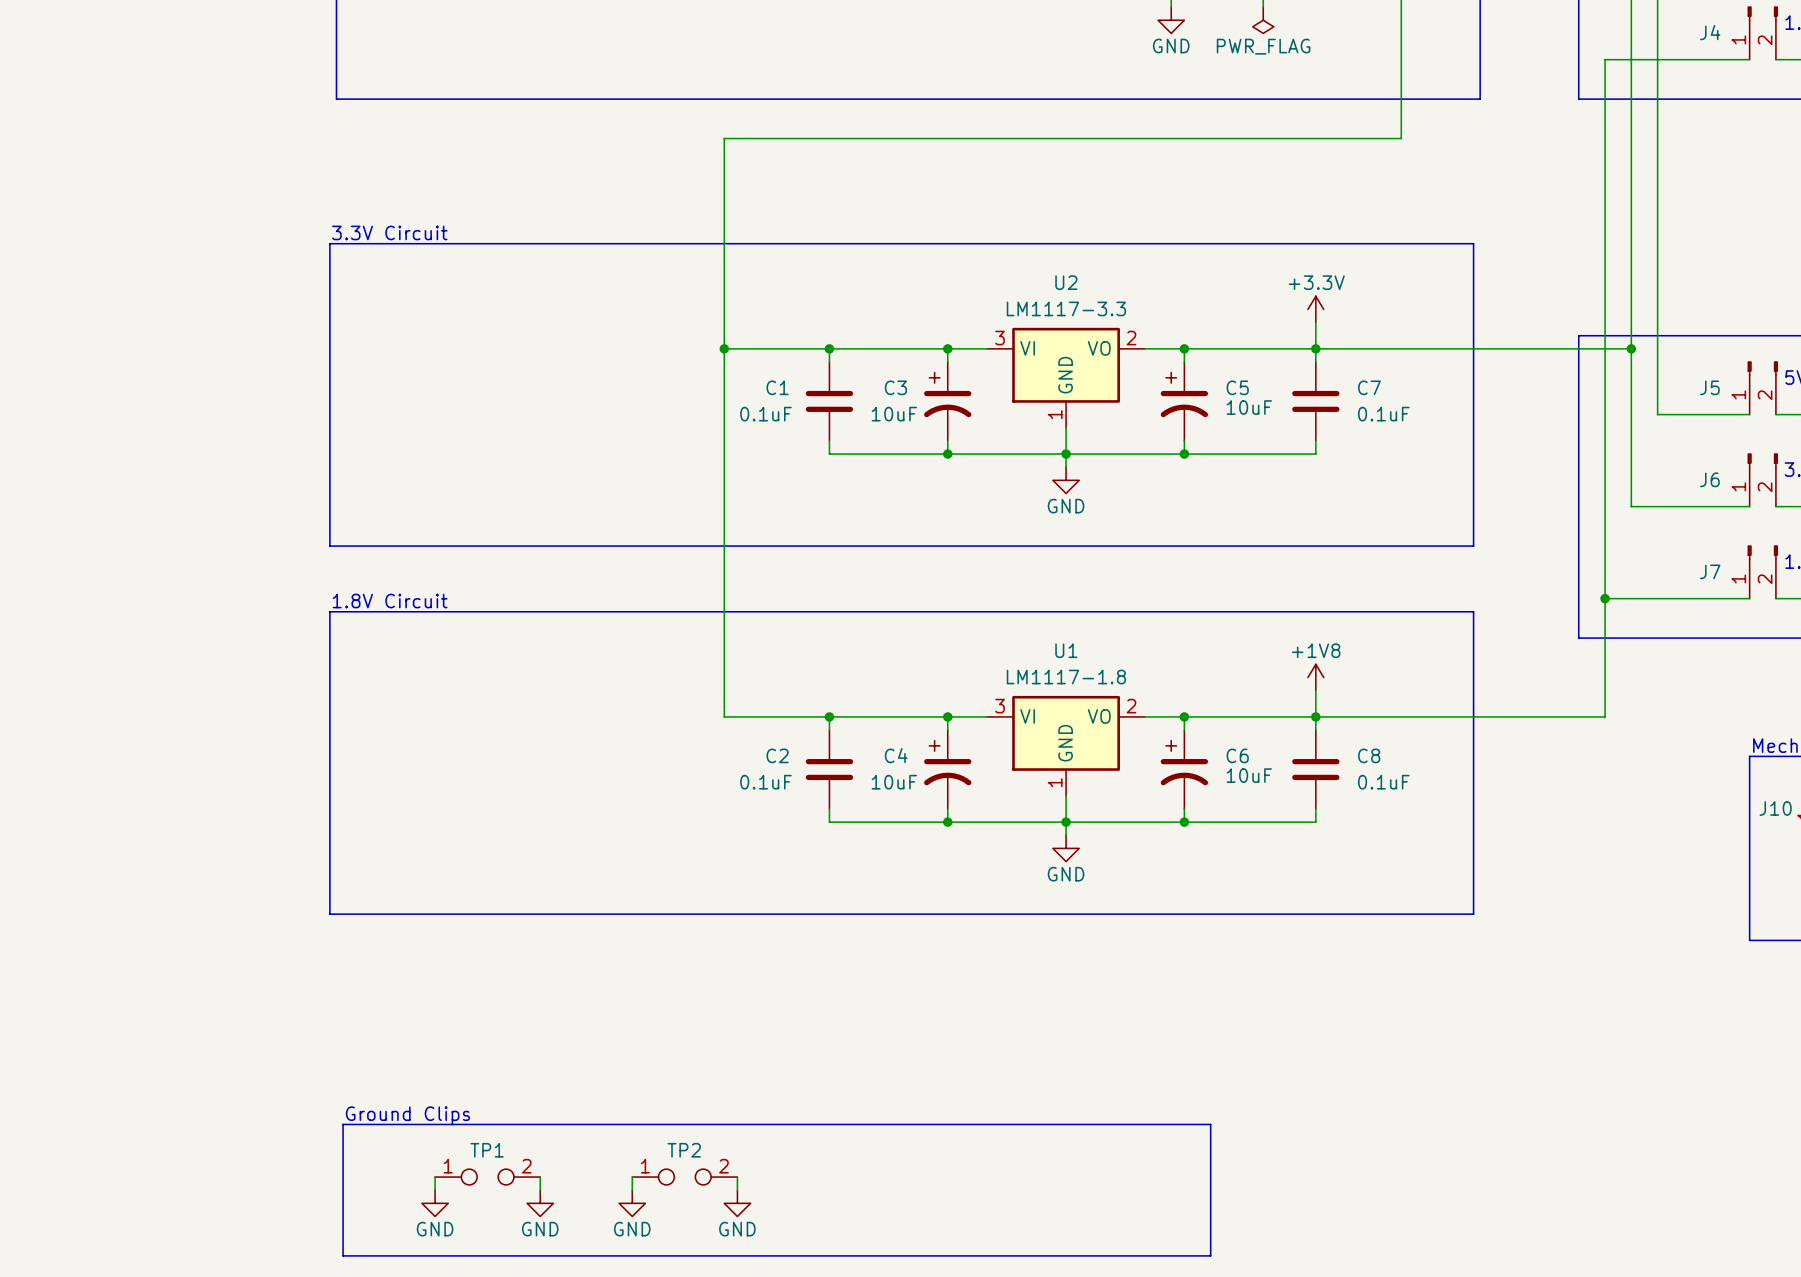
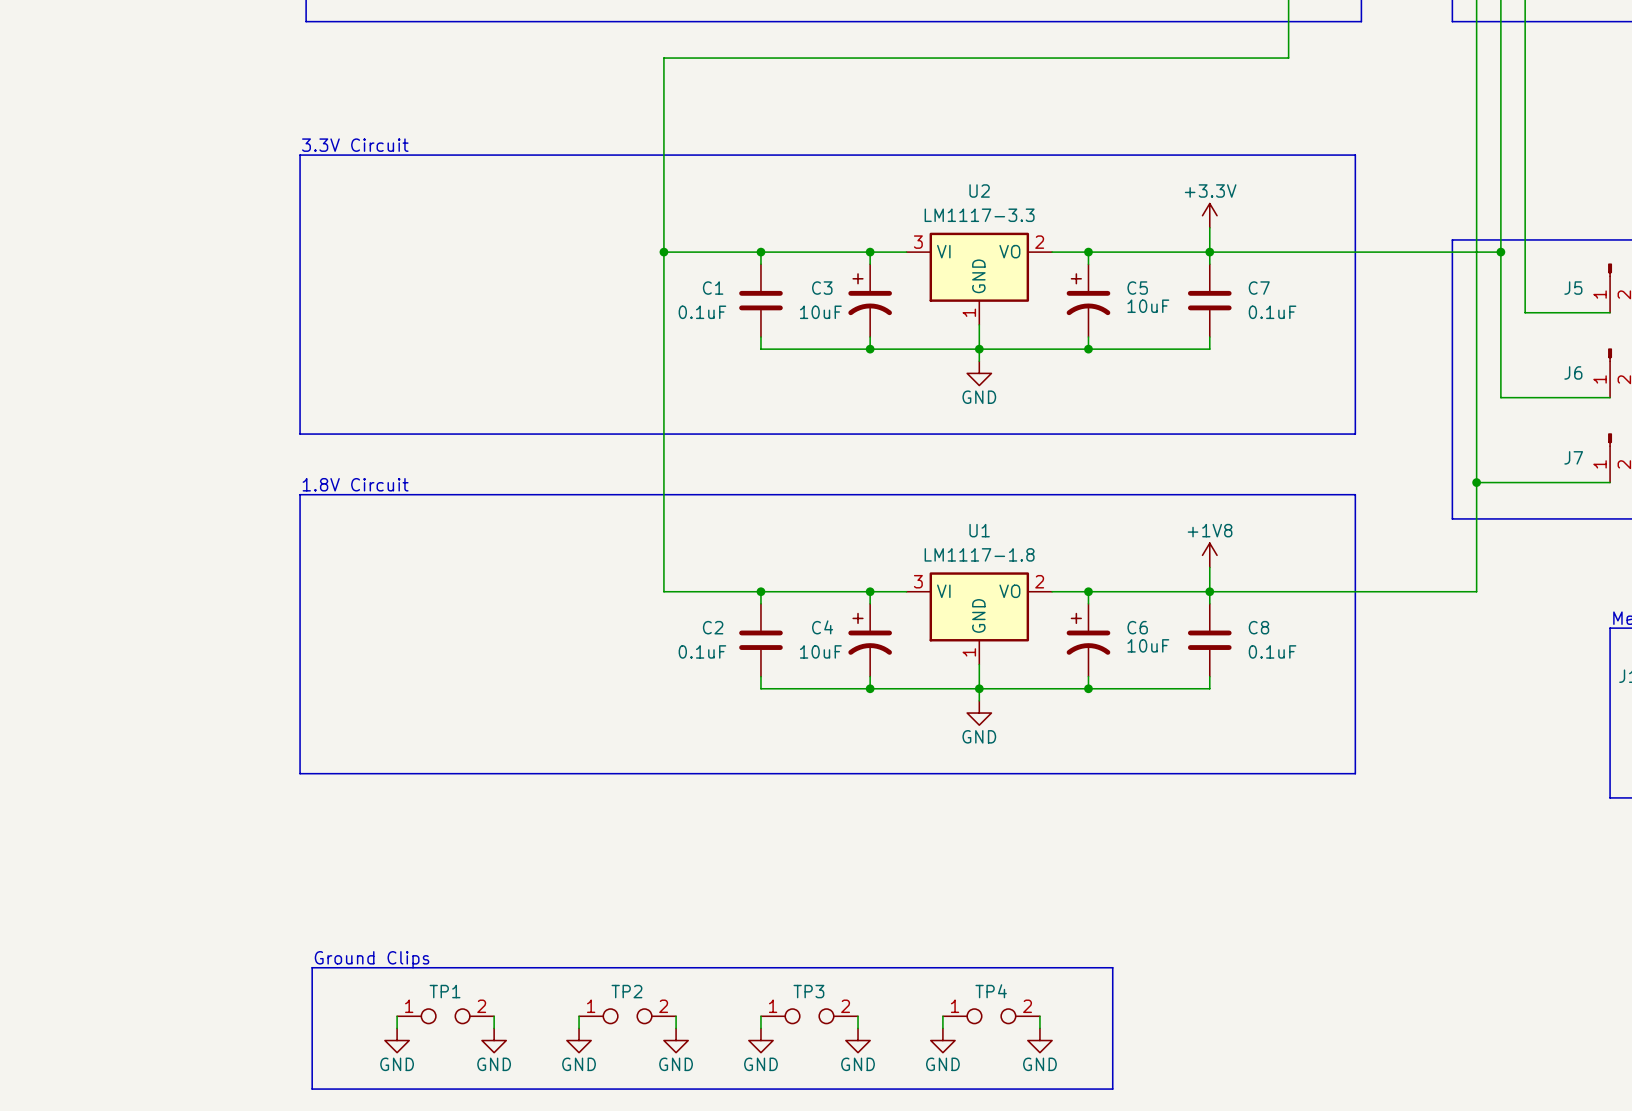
wire: none -> (760, 1016) (760, 1028)
TP3: none -> (809, 1016)
wire: none -> (858, 1016) (858, 1028)
wire: none -> (942, 1016) (942, 1028)
TP4: none -> (991, 1016)
wire: none -> (1039, 1016) (1039, 1028)
power symbol: none -> GND (760, 1040)
power symbol: none -> GND (858, 1040)
power symbol: none -> GND (942, 1040)
power symbol: none -> GND (1039, 1040)

